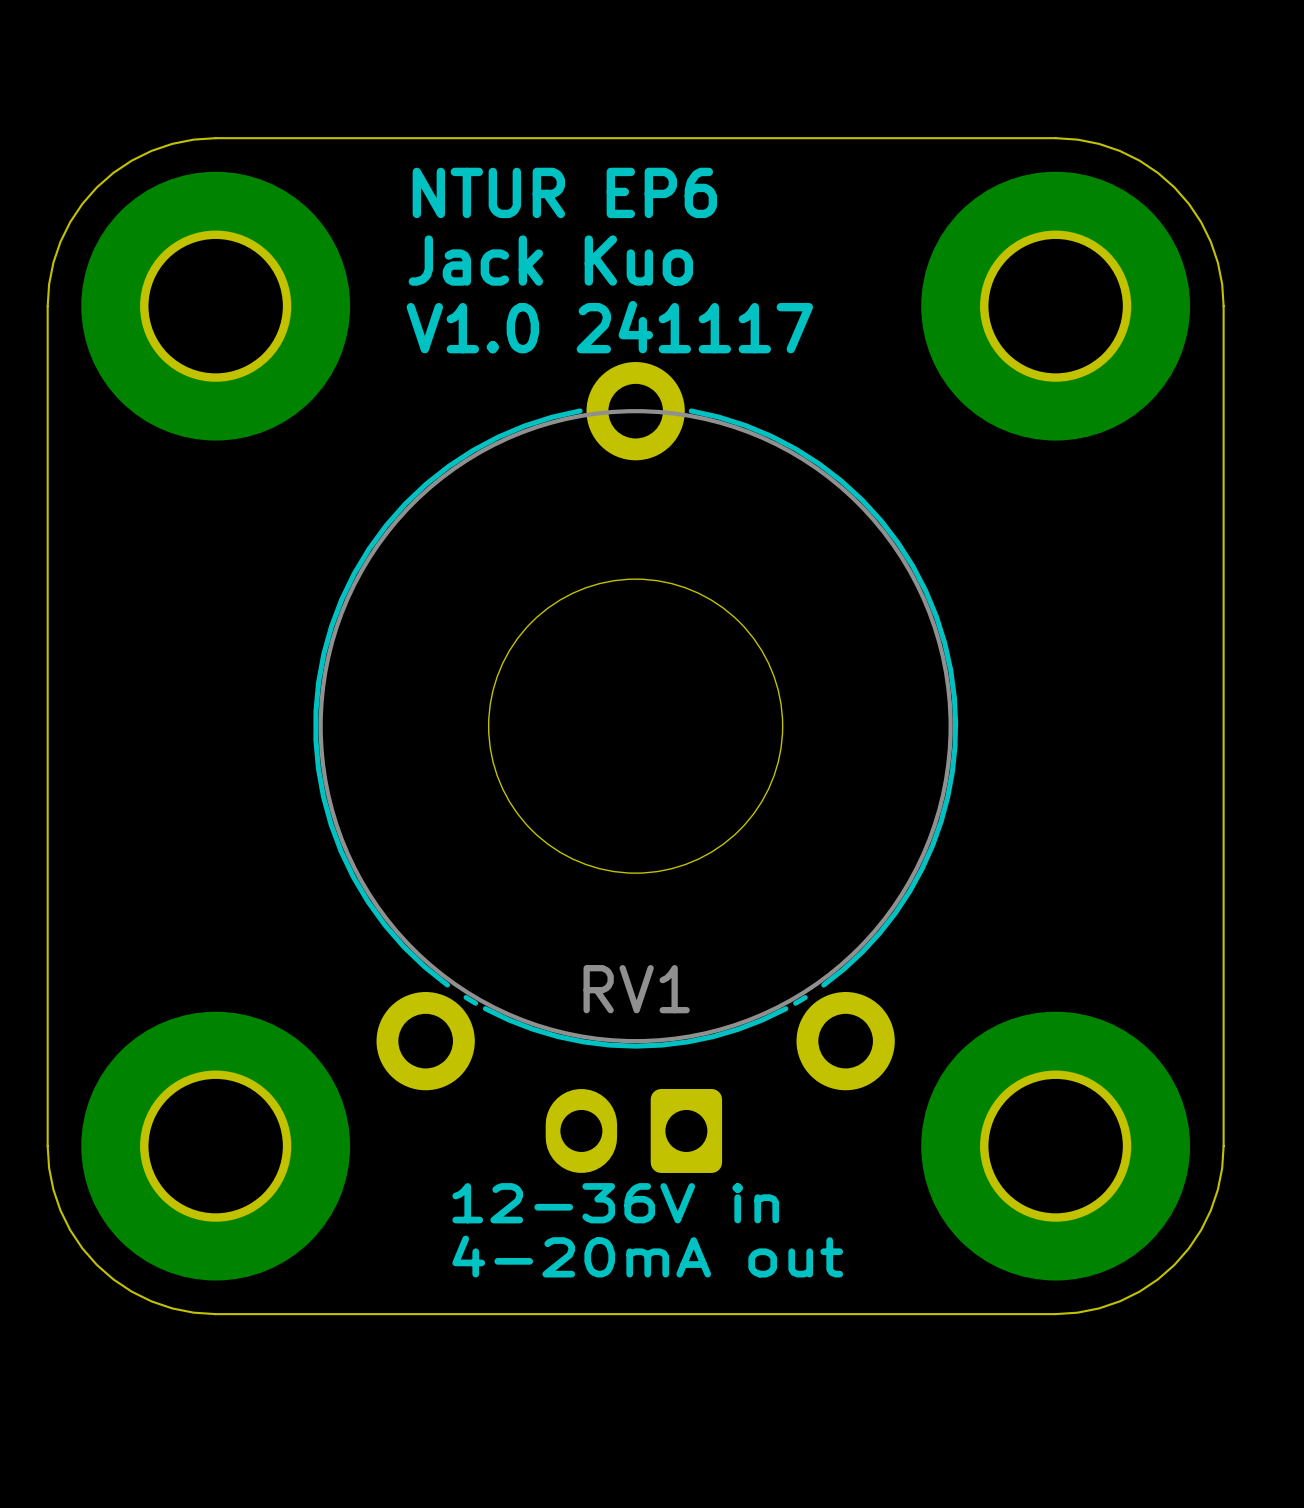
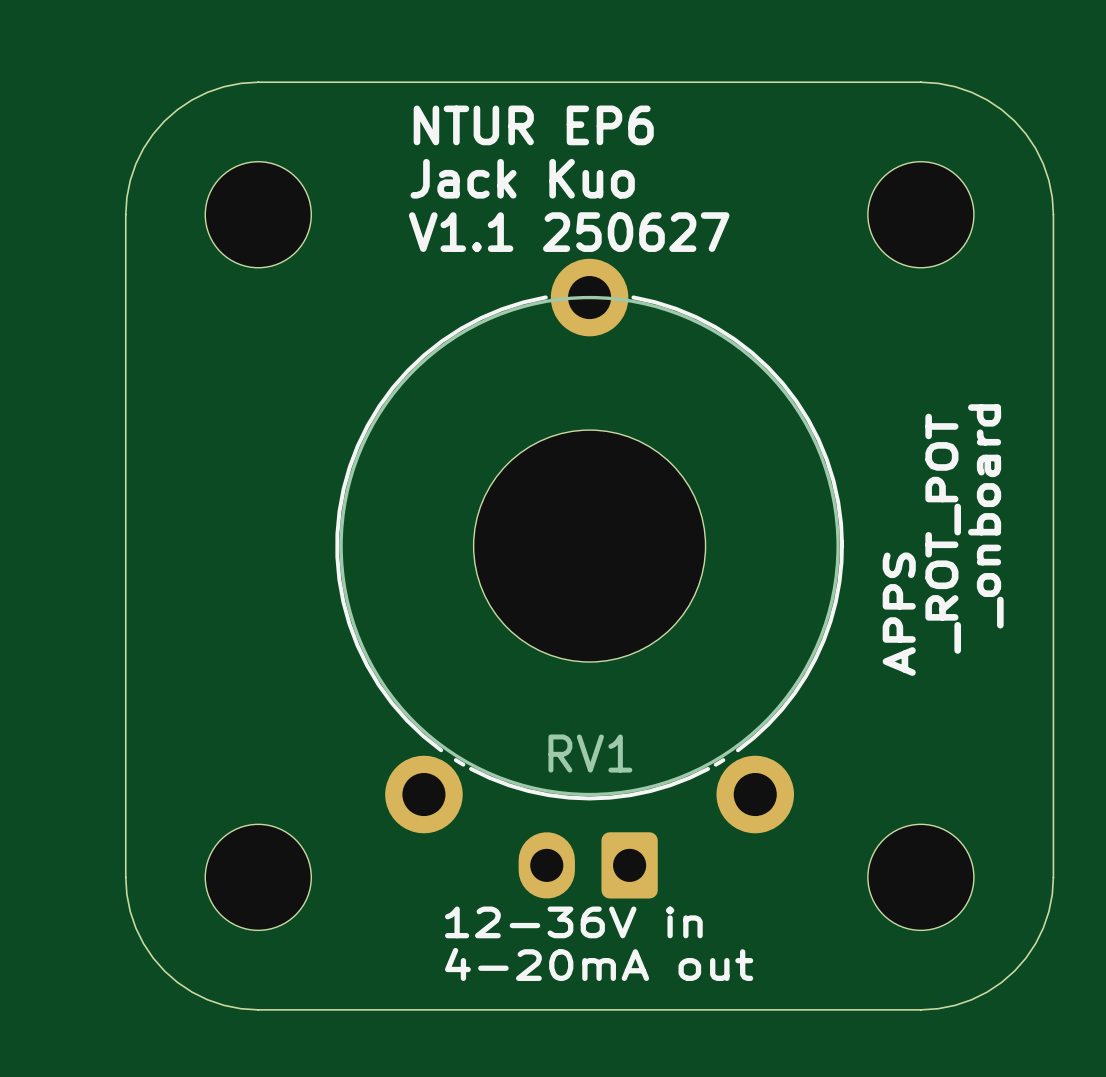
part footprint: [81, 171, 351, 441] -> [205, 161, 312, 268]
part footprint: [921, 171, 1191, 441] -> [867, 161, 974, 268]
text: V1.0 241117 (609, 327) -> V1.1 250627 (569, 232)
text: none -> _onboard (985, 516)
text: none -> _ROT_POT (943, 533)
text: none -> APPS (899, 614)
part footprint: [81, 1011, 351, 1281] -> [205, 824, 312, 931]
part footprint: [921, 1011, 1191, 1281] -> [867, 824, 974, 931]

